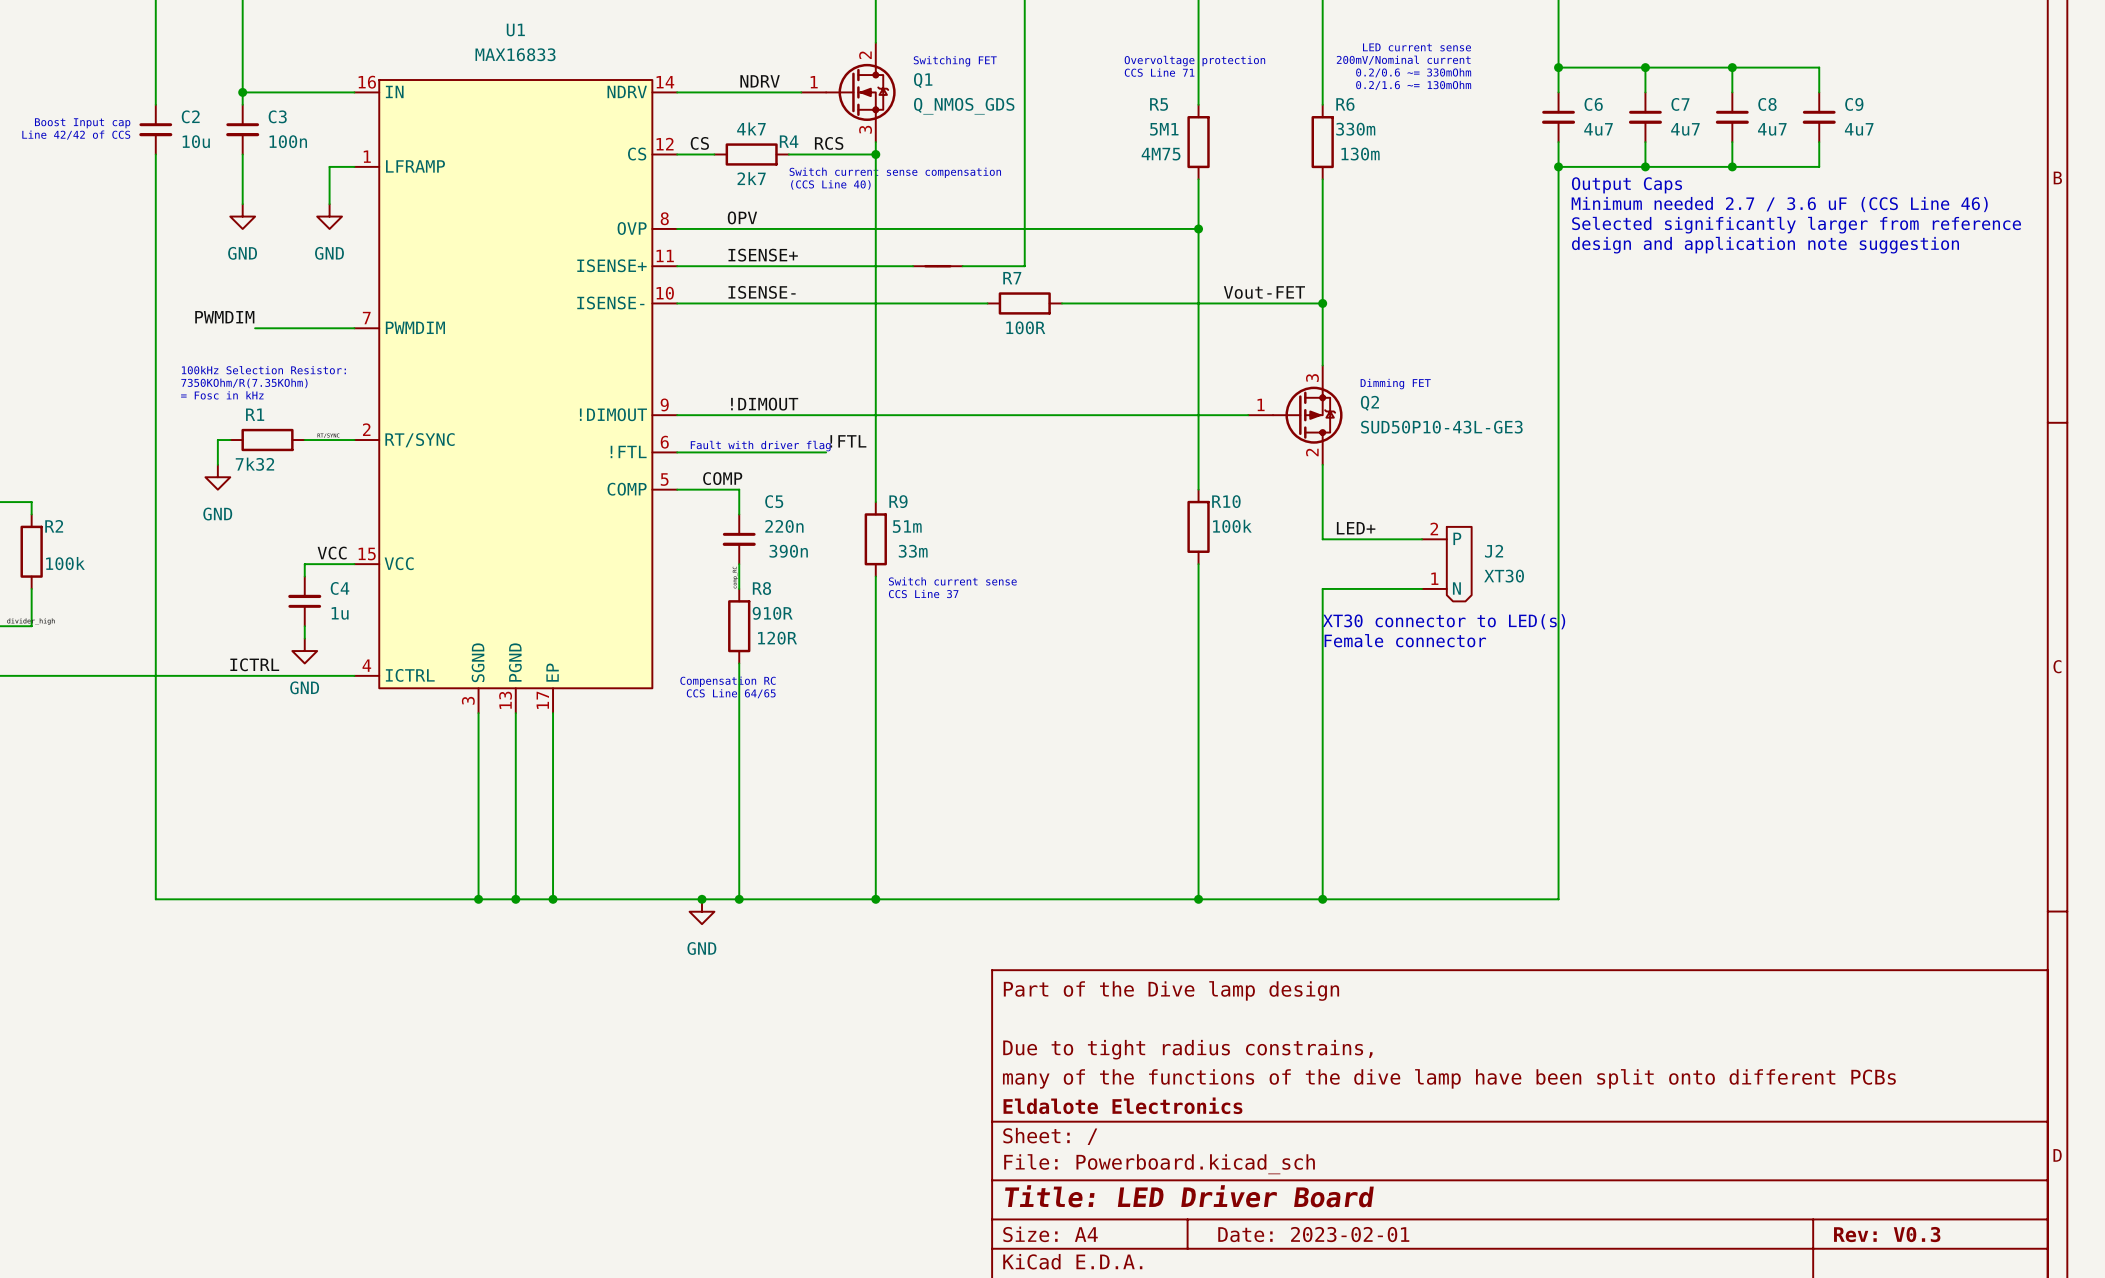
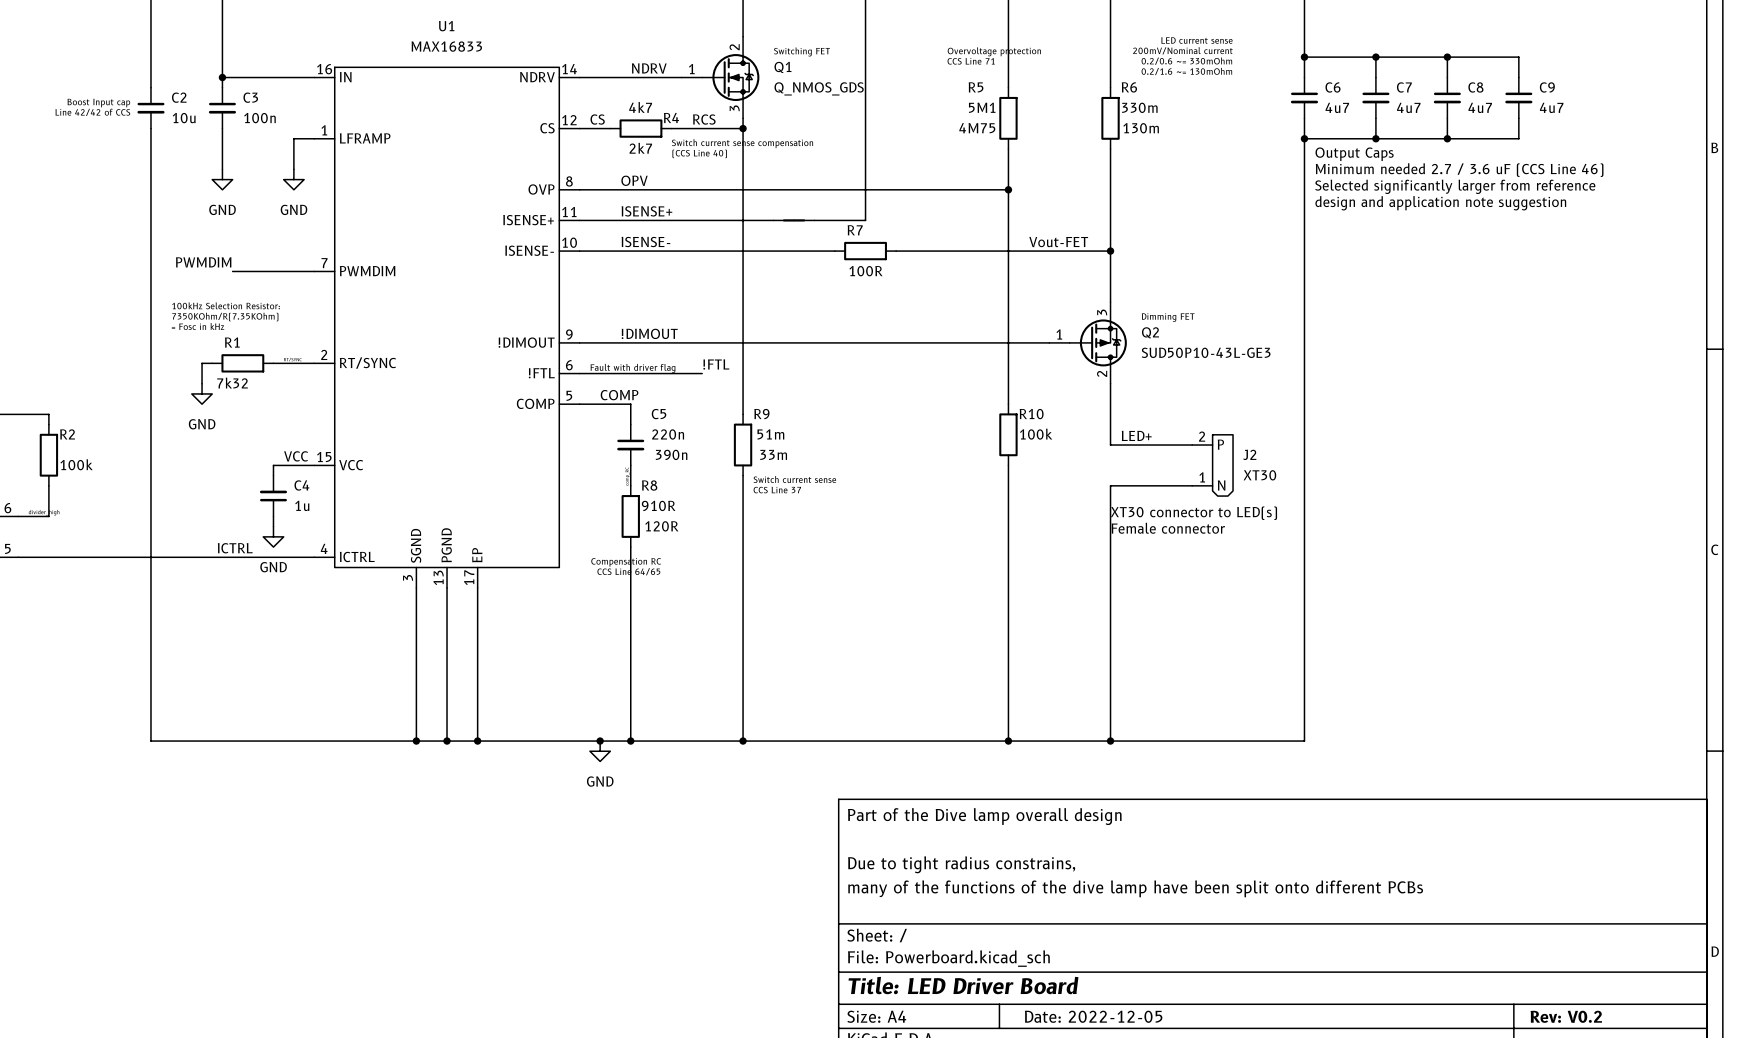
title block: Part of the Dive lamp design (1171, 990) -> Part of the Dive lamp overall design (984, 816)
title block: Eldalote Electronics (1122, 1105) -> none
title block: Date: 2023-02-01 (1313, 1234) -> Date: 2022-12-05 (1093, 1016)
title block: Rev: V0.3 (1887, 1234) -> Rev: V0.2 (1566, 1016)

